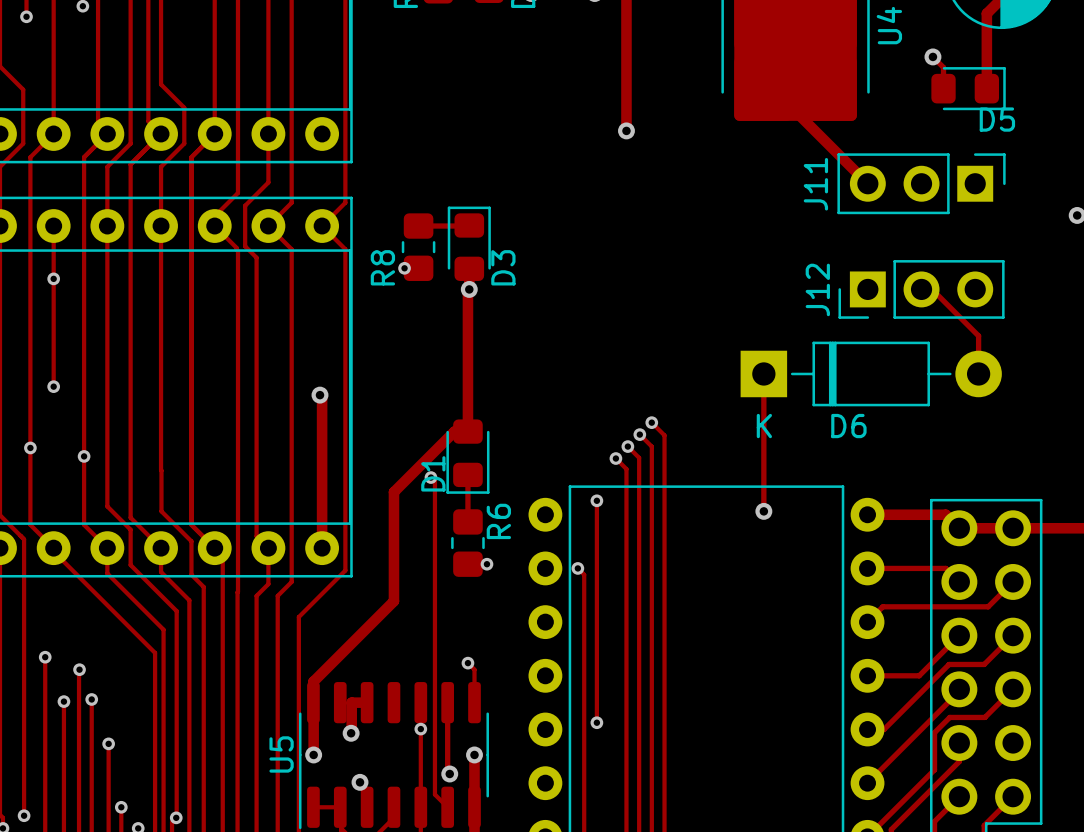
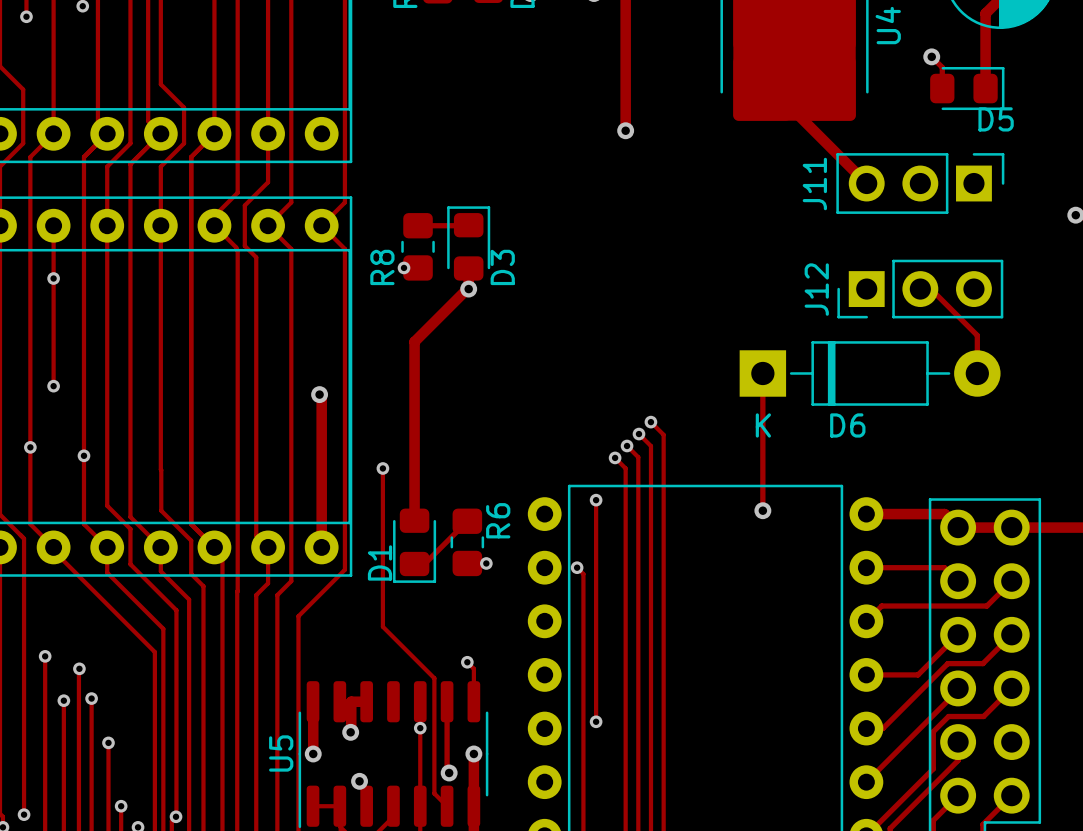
track: (467, 289) (467, 431) (454, 431) (393, 492) (393, 601) (313, 681) (313, 702) -> (467, 289) (414, 341) (414, 520)
D1 position: (467, 456) -> (414, 545)
track: (467, 474) (467, 521) -> (414, 564) (424, 564) (467, 521)
track: (430, 477) (434, 481) (434, 679) -> (382, 468) (382, 626) (434, 678)
via position: (430, 477) -> (382, 468)

